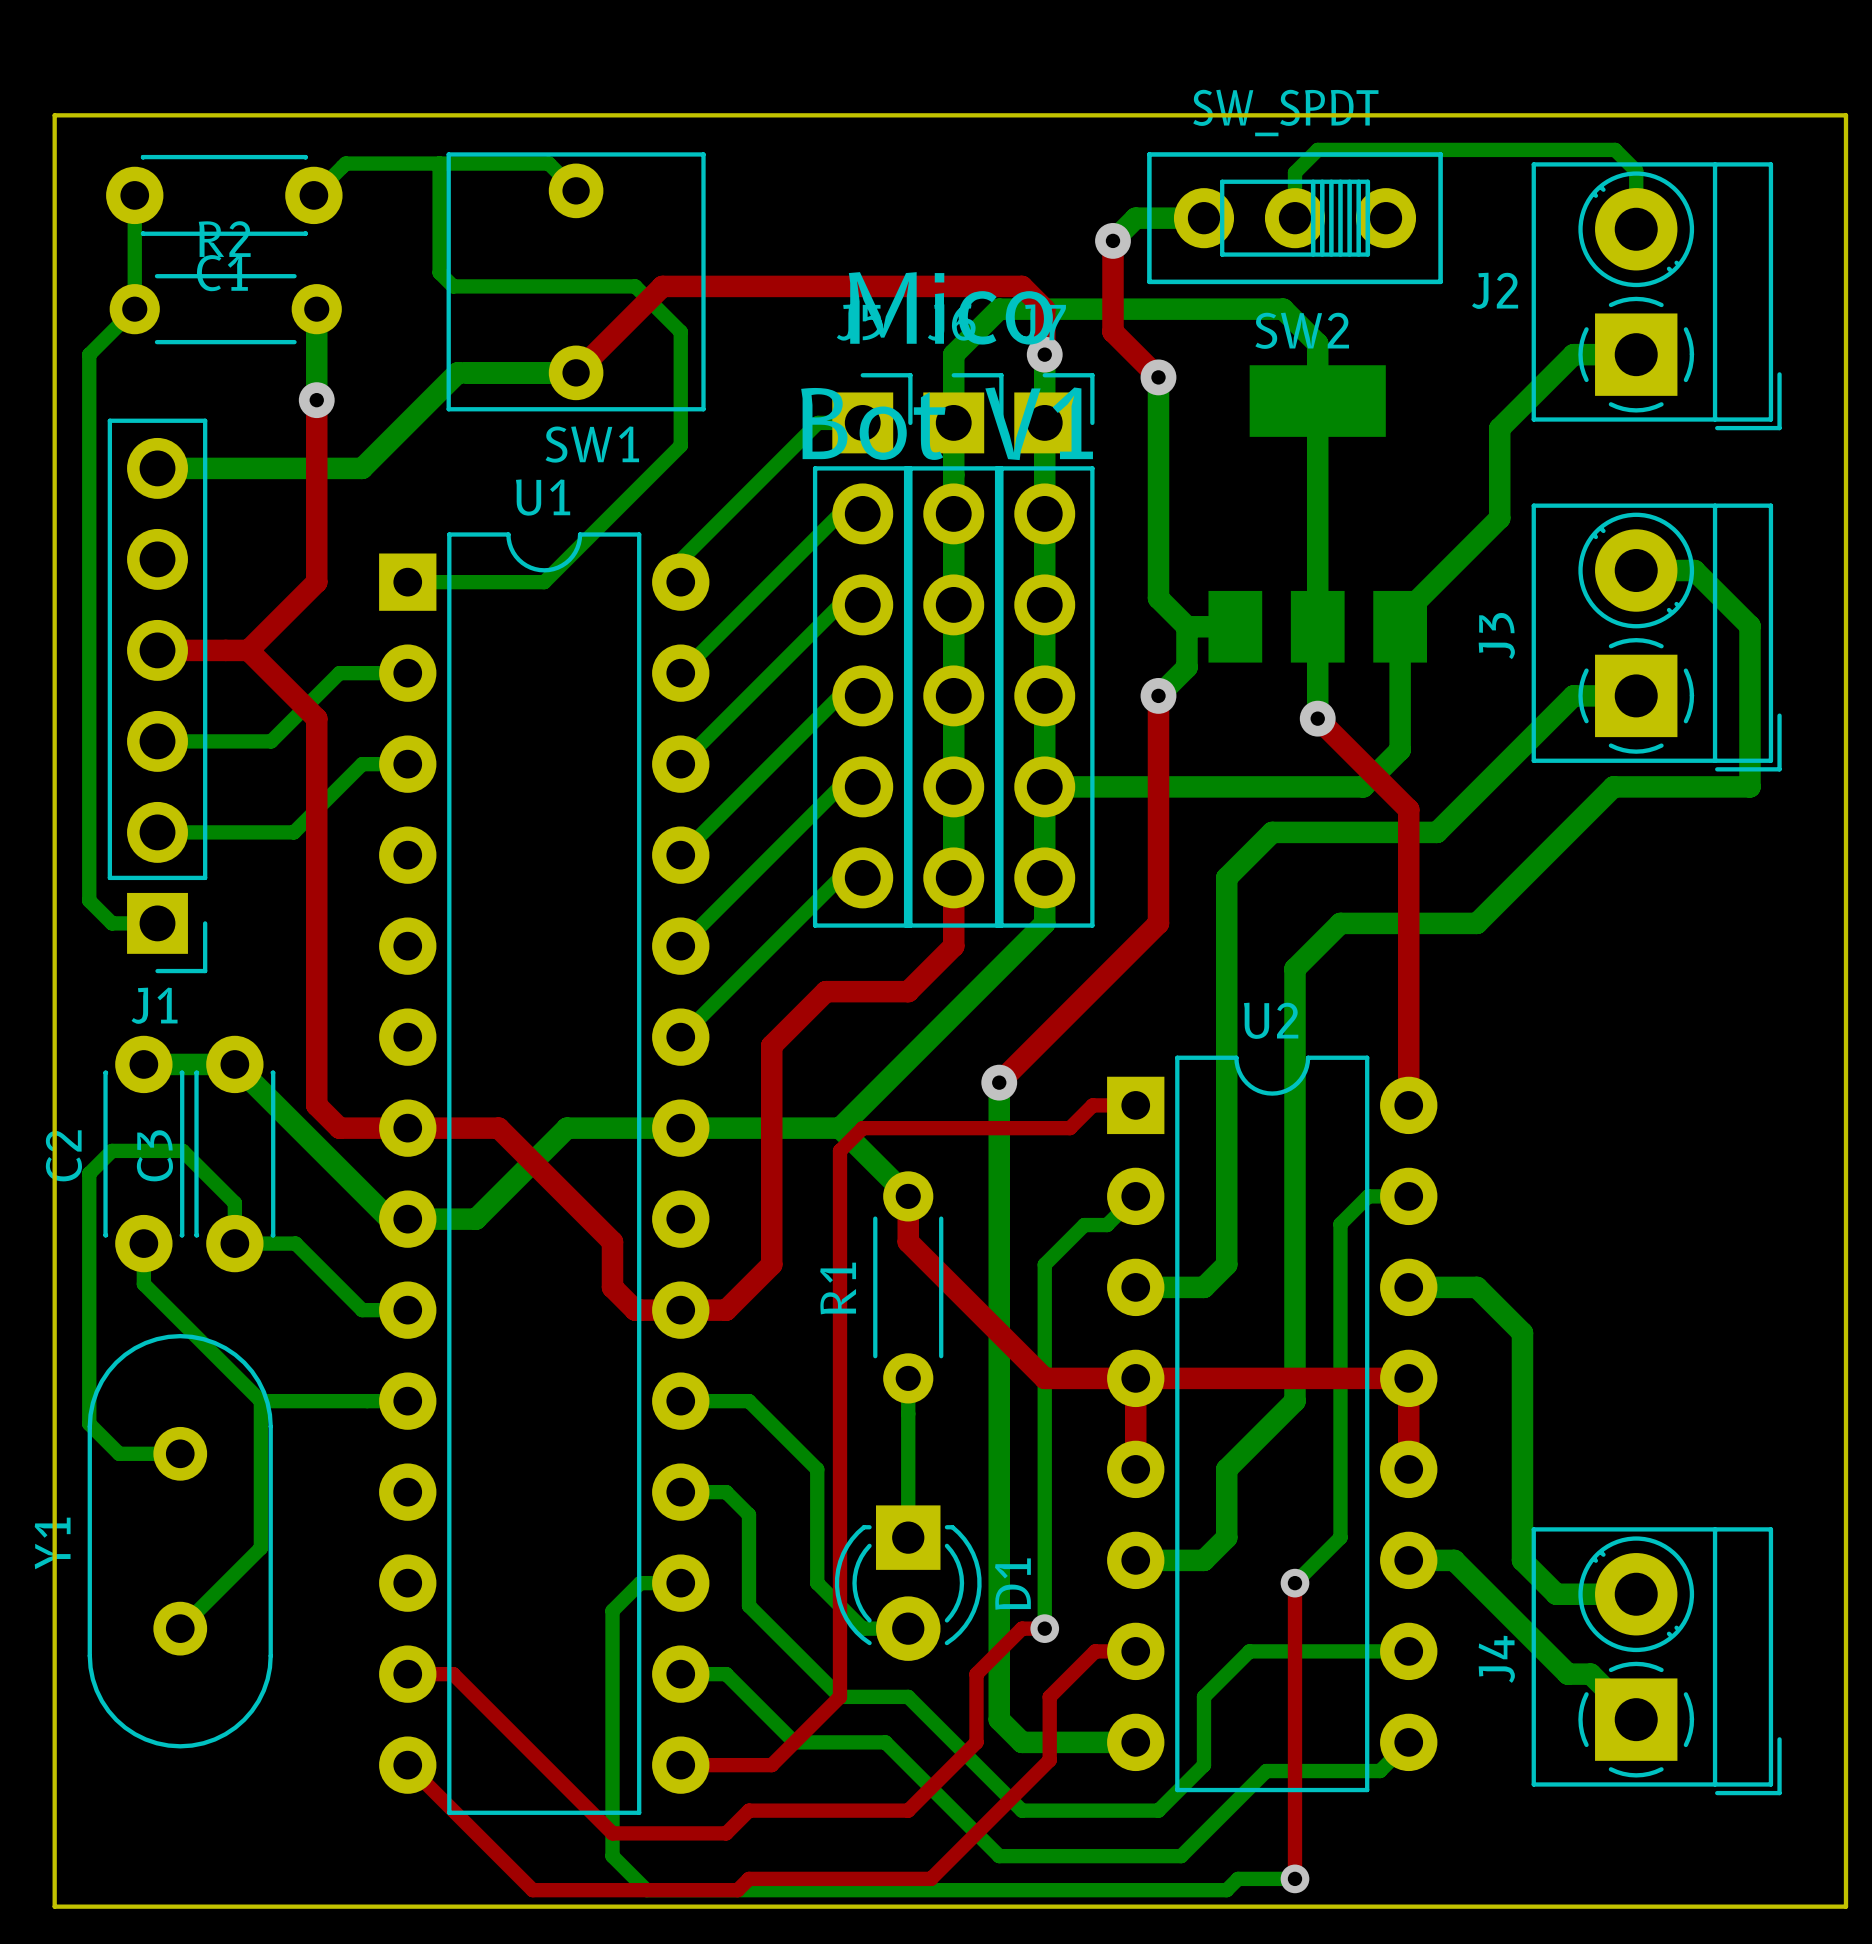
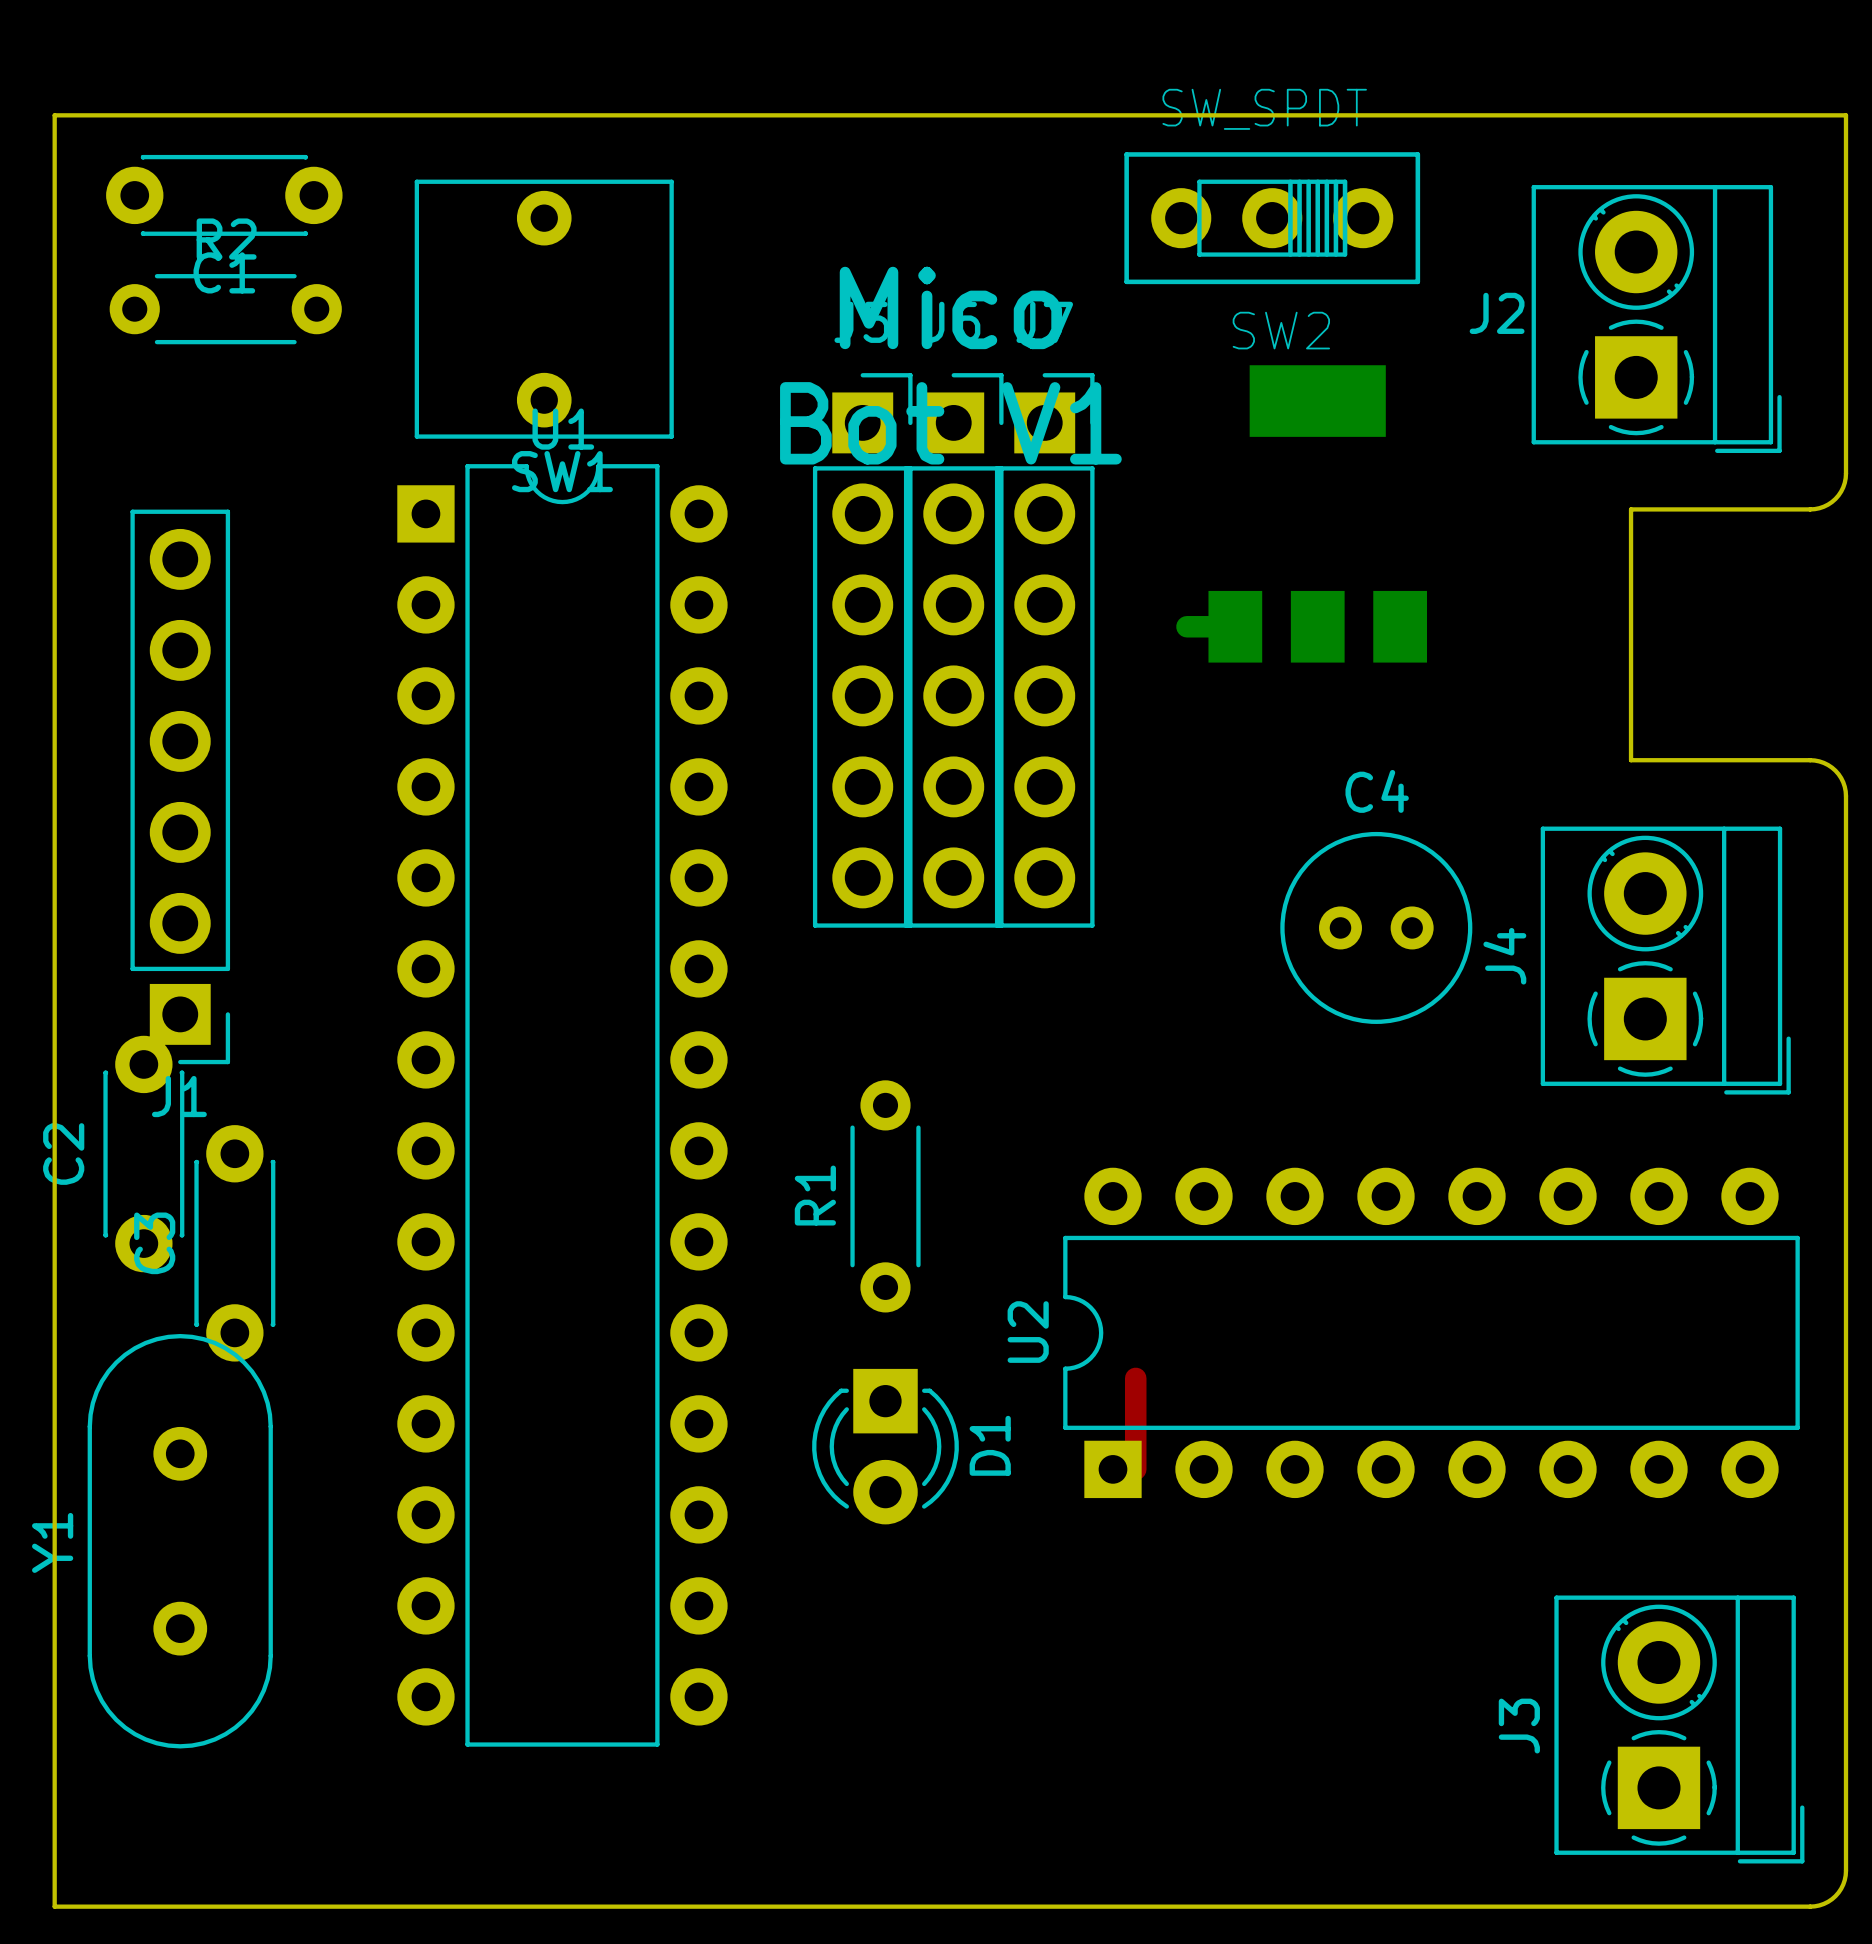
bottom track: (439, 163) (439, 272) (453, 286) (635, 286) (680, 331) (680, 445) (544, 582) (407, 582) -> none
bottom track: (576, 190) (548, 163) (345, 163) (313, 195) -> none
bottom track: (134, 195) (134, 309) (89, 354) (89, 900) (112, 923) (157, 923) -> none
bottom track: (1203, 218) (1135, 218) (1112, 240) -> none
bottom track: (1294, 218) (1294, 172) (1317, 149) (1615, 149) (1636, 171) (1636, 229) -> none
SW2 position: (1294, 218) -> (1272, 218)
top track: (1112, 240) (1112, 331) (1158, 377) -> none
via: (1112, 240) -> none
SW1 position: (576, 281) -> (544, 309)
J2 position: (1656, 296) -> (1656, 319)
bottom track: (316, 309) (316, 400) -> none
bottom track: (1044, 354) (1044, 923) (839, 1128) -> none
top track: (1044, 354) (1044, 309) (1021, 286) (662, 286) (576, 372) -> none
via: (1044, 354) -> none
bottom track: (1636, 354) (1573, 354) (1499, 428) (1499, 518) (1400, 617) (1400, 750) (1363, 786) (1044, 786) -> none
bottom track: (576, 372) (457, 372) (362, 468) (157, 468) -> none
bottom track: (1158, 377) (1158, 598) (1186, 626) (1186, 667) (1158, 695) -> none
via: (1158, 377) -> none
top track: (316, 400) (316, 582) (248, 650) -> none
via: (316, 400) -> none
bottom track: (862, 422) (817, 422) (680, 560) (680, 582) -> none
board edge: (1845, 473) (1845, 796) -> (1845, 473) (1844, 482) (1838, 495) (1828, 504) (1814, 509) (1631, 509) (1631, 760) (1814, 760) (1828, 765) (1838, 774) (1844, 786) (1845, 796)
bottom track: (862, 513) (839, 513) (680, 673) -> none
bottom track: (1636, 570) (1694, 570) (1749, 625) (1749, 786) (1613, 786) (1476, 923) (1340, 923) (1294, 968) (1294, 1401) (1226, 1469) (1226, 1537) (1203, 1560) (1135, 1560) -> none
bottom track: (862, 604) (839, 604) (680, 764) -> none
J3 position: (1656, 637) -> (1679, 1729)
top track: (157, 650) (248, 650) -> none
top track: (248, 650) (316, 718) (316, 1105) (339, 1128) (498, 1128) (612, 1241) (612, 1287) (635, 1310) (726, 1310) (771, 1264) (771, 1045) (825, 991) (908, 991) (953, 946) (953, 877) -> none
bottom track: (407, 673) (339, 673) (271, 741) (157, 741) -> none
J1 position: (157, 695) -> (180, 786)
bottom track: (862, 695) (839, 695) (680, 855) -> none
top track: (1158, 695) (1158, 923) (999, 1082) -> none
via: (1158, 695) -> none
bottom track: (1636, 695) (1573, 695) (1437, 832) (1272, 832) (1226, 877) (1226, 1264) (1203, 1287) (1135, 1287) -> none
bottom track: (1317, 718) (1317, 343) (1283, 309) (999, 309) (953, 354) (953, 858) -> none
top track: (1317, 718) (1408, 809) (1408, 1105) -> none
via: (1317, 718) -> none
bottom track: (407, 764) (362, 764) (294, 832) (157, 832) -> none
bottom track: (862, 786) (839, 786) (680, 946) -> none
bottom track: (862, 877) (839, 877) (680, 1037) -> none
C4: none -> (1376, 927)
bottom track: (143, 1064) (234, 1064) (389, 1219) (476, 1219) (567, 1128) (839, 1128) -> none
bottom track: (999, 1082) (999, 1719) (1021, 1742) (1135, 1742) -> none
via: (999, 1082) -> none
top track: (1135, 1105) (1092, 1105) (1070, 1128) (862, 1128) (839, 1150) (839, 1696) (771, 1765) (680, 1765) -> none
bottom track: (839, 1128) (908, 1196) -> none
C3 position: (234, 1154) -> (234, 1243)
U1 position: (544, 1173) -> (562, 1105)
top track: (908, 1196) (908, 1241) (1044, 1378) (1408, 1378) (1408, 1469) -> none
bottom track: (1135, 1196) (1107, 1225) (1084, 1225) (1044, 1264) (1044, 1628) -> none
bottom track: (1408, 1196) (1368, 1196) (1340, 1224) (1340, 1537) (1294, 1583) -> none
bottom track: (143, 1243) (143, 1284) (260, 1401) -> none
R1 position: (908, 1287) -> (885, 1196)
bottom track: (1408, 1287) (1476, 1287) (1522, 1332) (1522, 1560) (1556, 1594) (1636, 1594) -> none
bottom track: (407, 1310) (362, 1310) (295, 1243) (234, 1243) (234, 1203) (182, 1150) (112, 1150) (89, 1173) (89, 1423) (119, 1453) (180, 1453) -> none
bottom track: (908, 1378) (908, 1537) -> none
bottom track: (260, 1401) (407, 1401) -> none
bottom track: (260, 1401) (260, 1548) (180, 1628) -> none
bottom track: (680, 1401) (749, 1401) (817, 1469) (817, 1583) (862, 1628) (908, 1628) -> none
U2 rotation: 0° (1272, 1423) -> 90° counterclockwise (1431, 1332)
bottom track: (680, 1492) (726, 1492) (749, 1514) (749, 1605) (839, 1696) (908, 1696) (1021, 1810) (1158, 1810) (1203, 1765) (1203, 1696) (1249, 1651) (1408, 1651) -> none
D1 footprint: [834, 1505, 982, 1661] -> [812, 1368, 959, 1525]
bottom track: (1408, 1560) (1454, 1560) (1567, 1674) (1590, 1674) (1636, 1719) -> none
bottom track: (680, 1583) (640, 1583) (612, 1610) (612, 1856) (646, 1890) (1226, 1890) (1238, 1878) (1294, 1878) -> none
top track: (1294, 1583) (1294, 1878) -> none
via: (1294, 1583) -> none
top track: (1044, 1628) (1021, 1628) (976, 1674) (976, 1742) (908, 1810) (749, 1810) (726, 1833) (612, 1833) (453, 1674) (407, 1674) -> none
via: (1044, 1628) -> none
top track: (1135, 1651) (1095, 1651) (1049, 1696) (1049, 1760) (930, 1878) (749, 1878) (737, 1890) (532, 1890) (407, 1765) -> none
J4 position: (1656, 1661) -> (1665, 960)
bottom track: (680, 1674) (726, 1674) (794, 1742) (885, 1742) (999, 1856) (1181, 1856) (1266, 1771) (1380, 1771) (1408, 1742) -> none
board edge: (1845, 1870) (1845, 1906) (1810, 1906) -> (1845, 1870) (1843, 1884) (1835, 1896) (1823, 1903) (1810, 1906)
via: (1294, 1878) -> none

